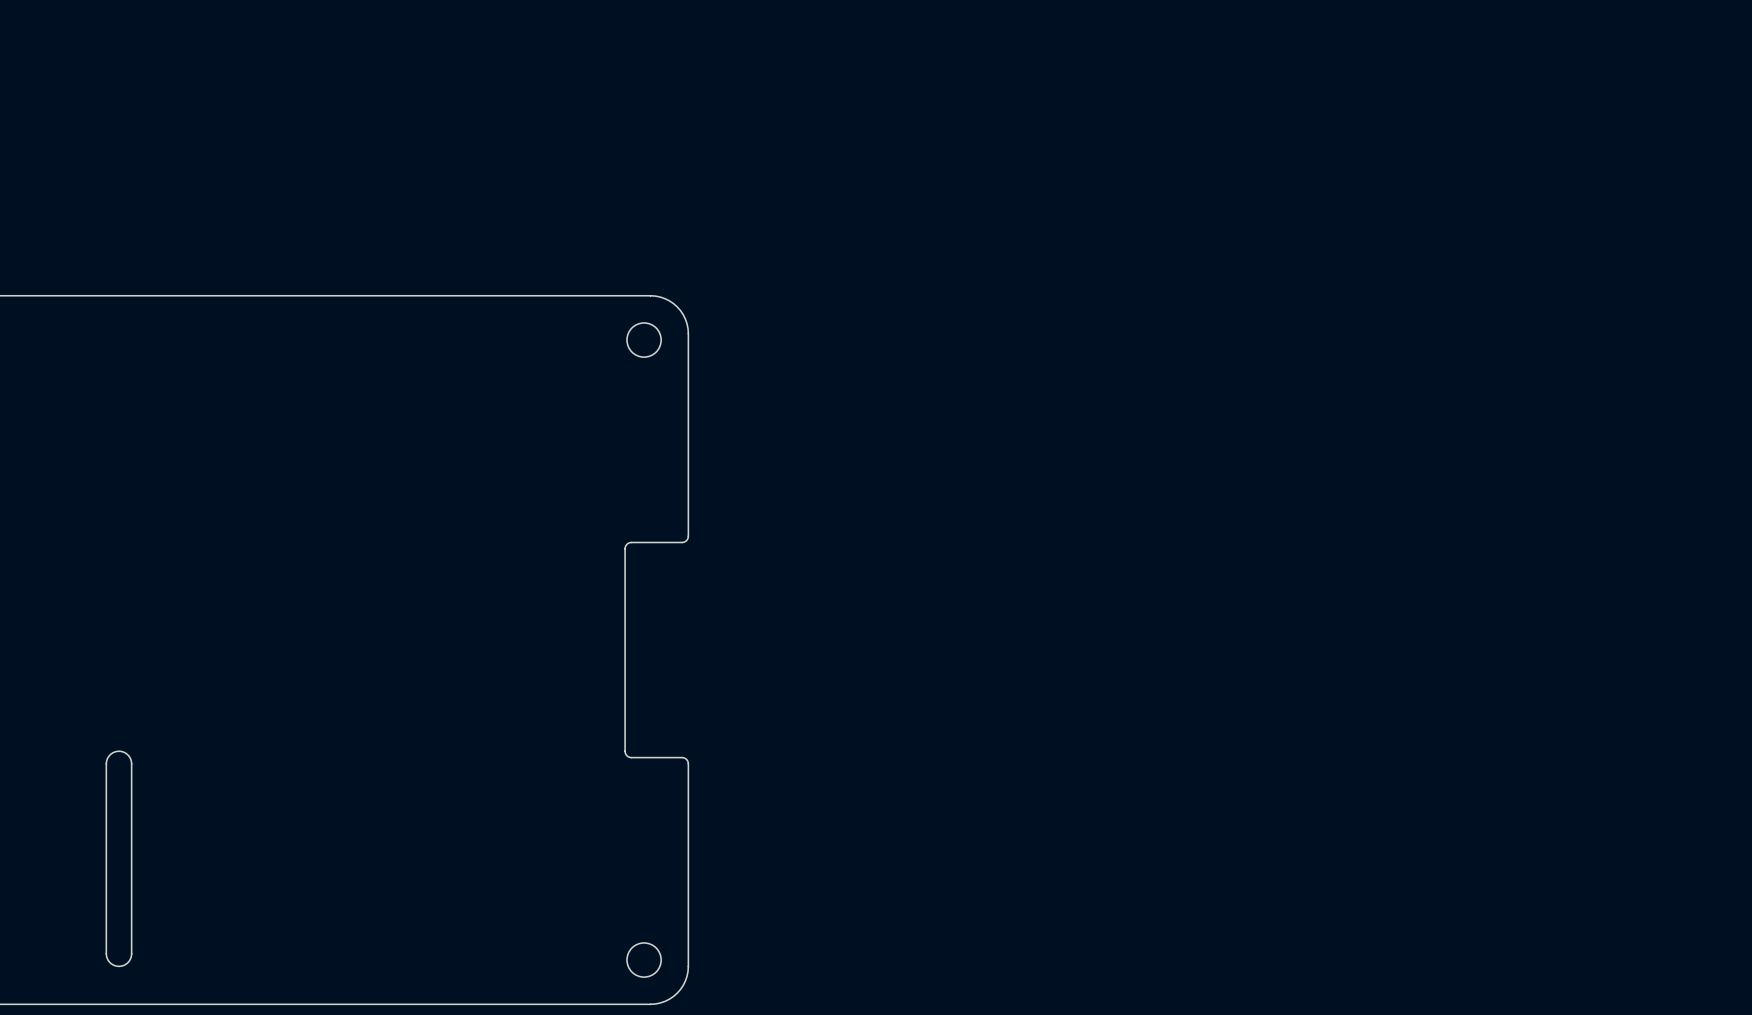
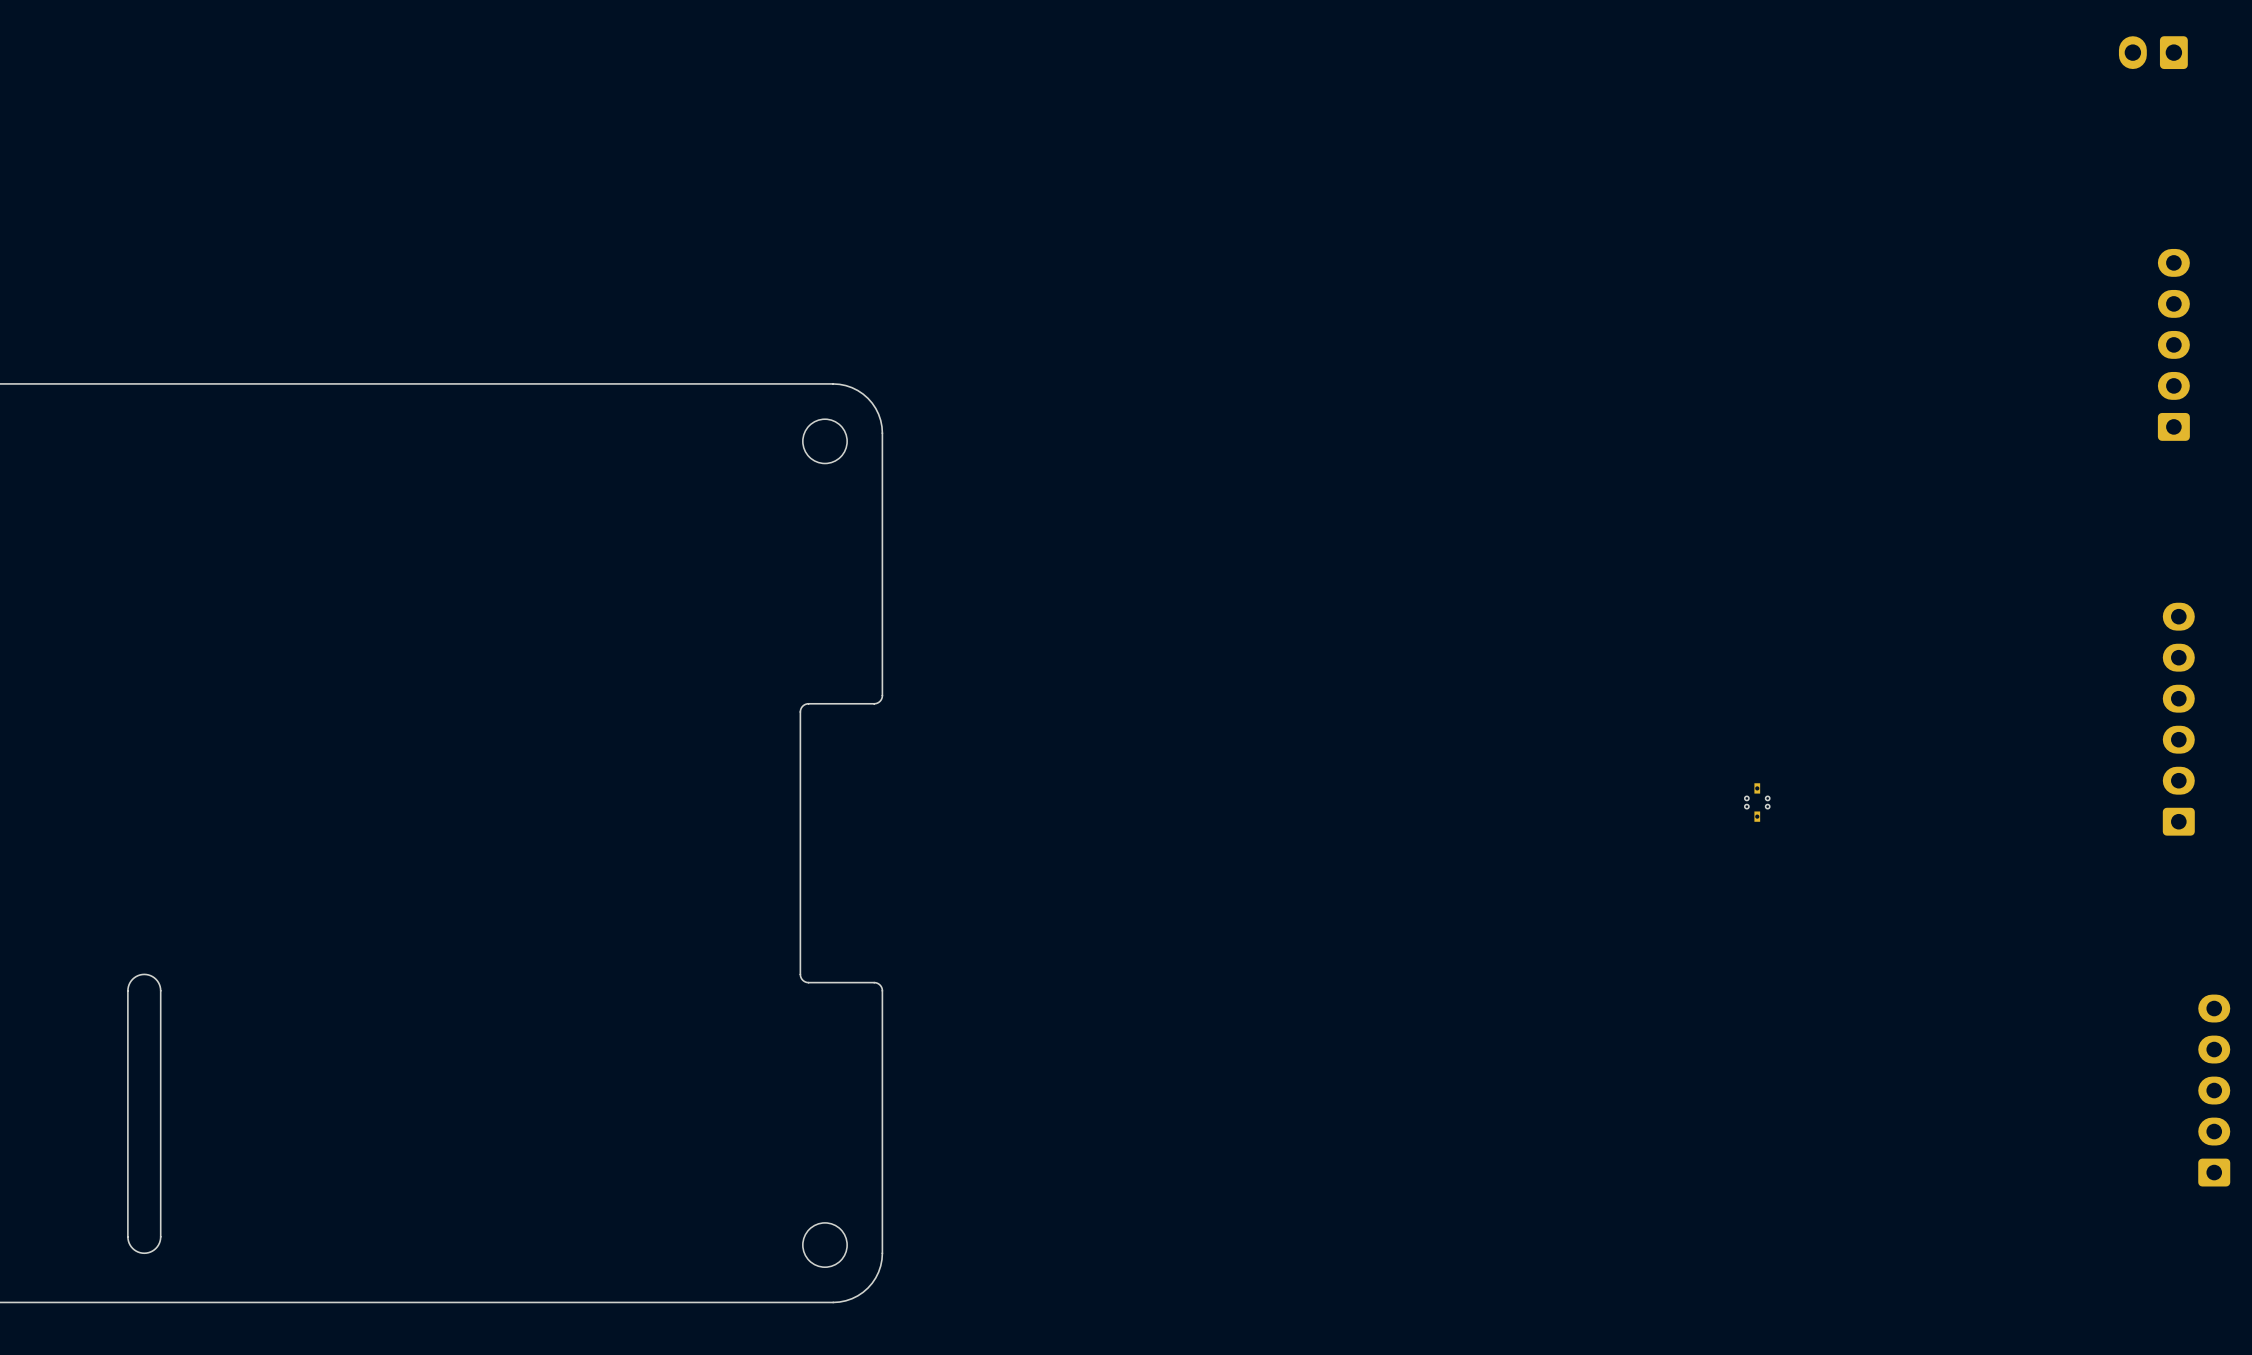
part: none -> (2153, 52)
part: none -> (2173, 344)
part: none -> (2178, 719)
part: none -> (1757, 802)
part: none -> (2214, 1090)

